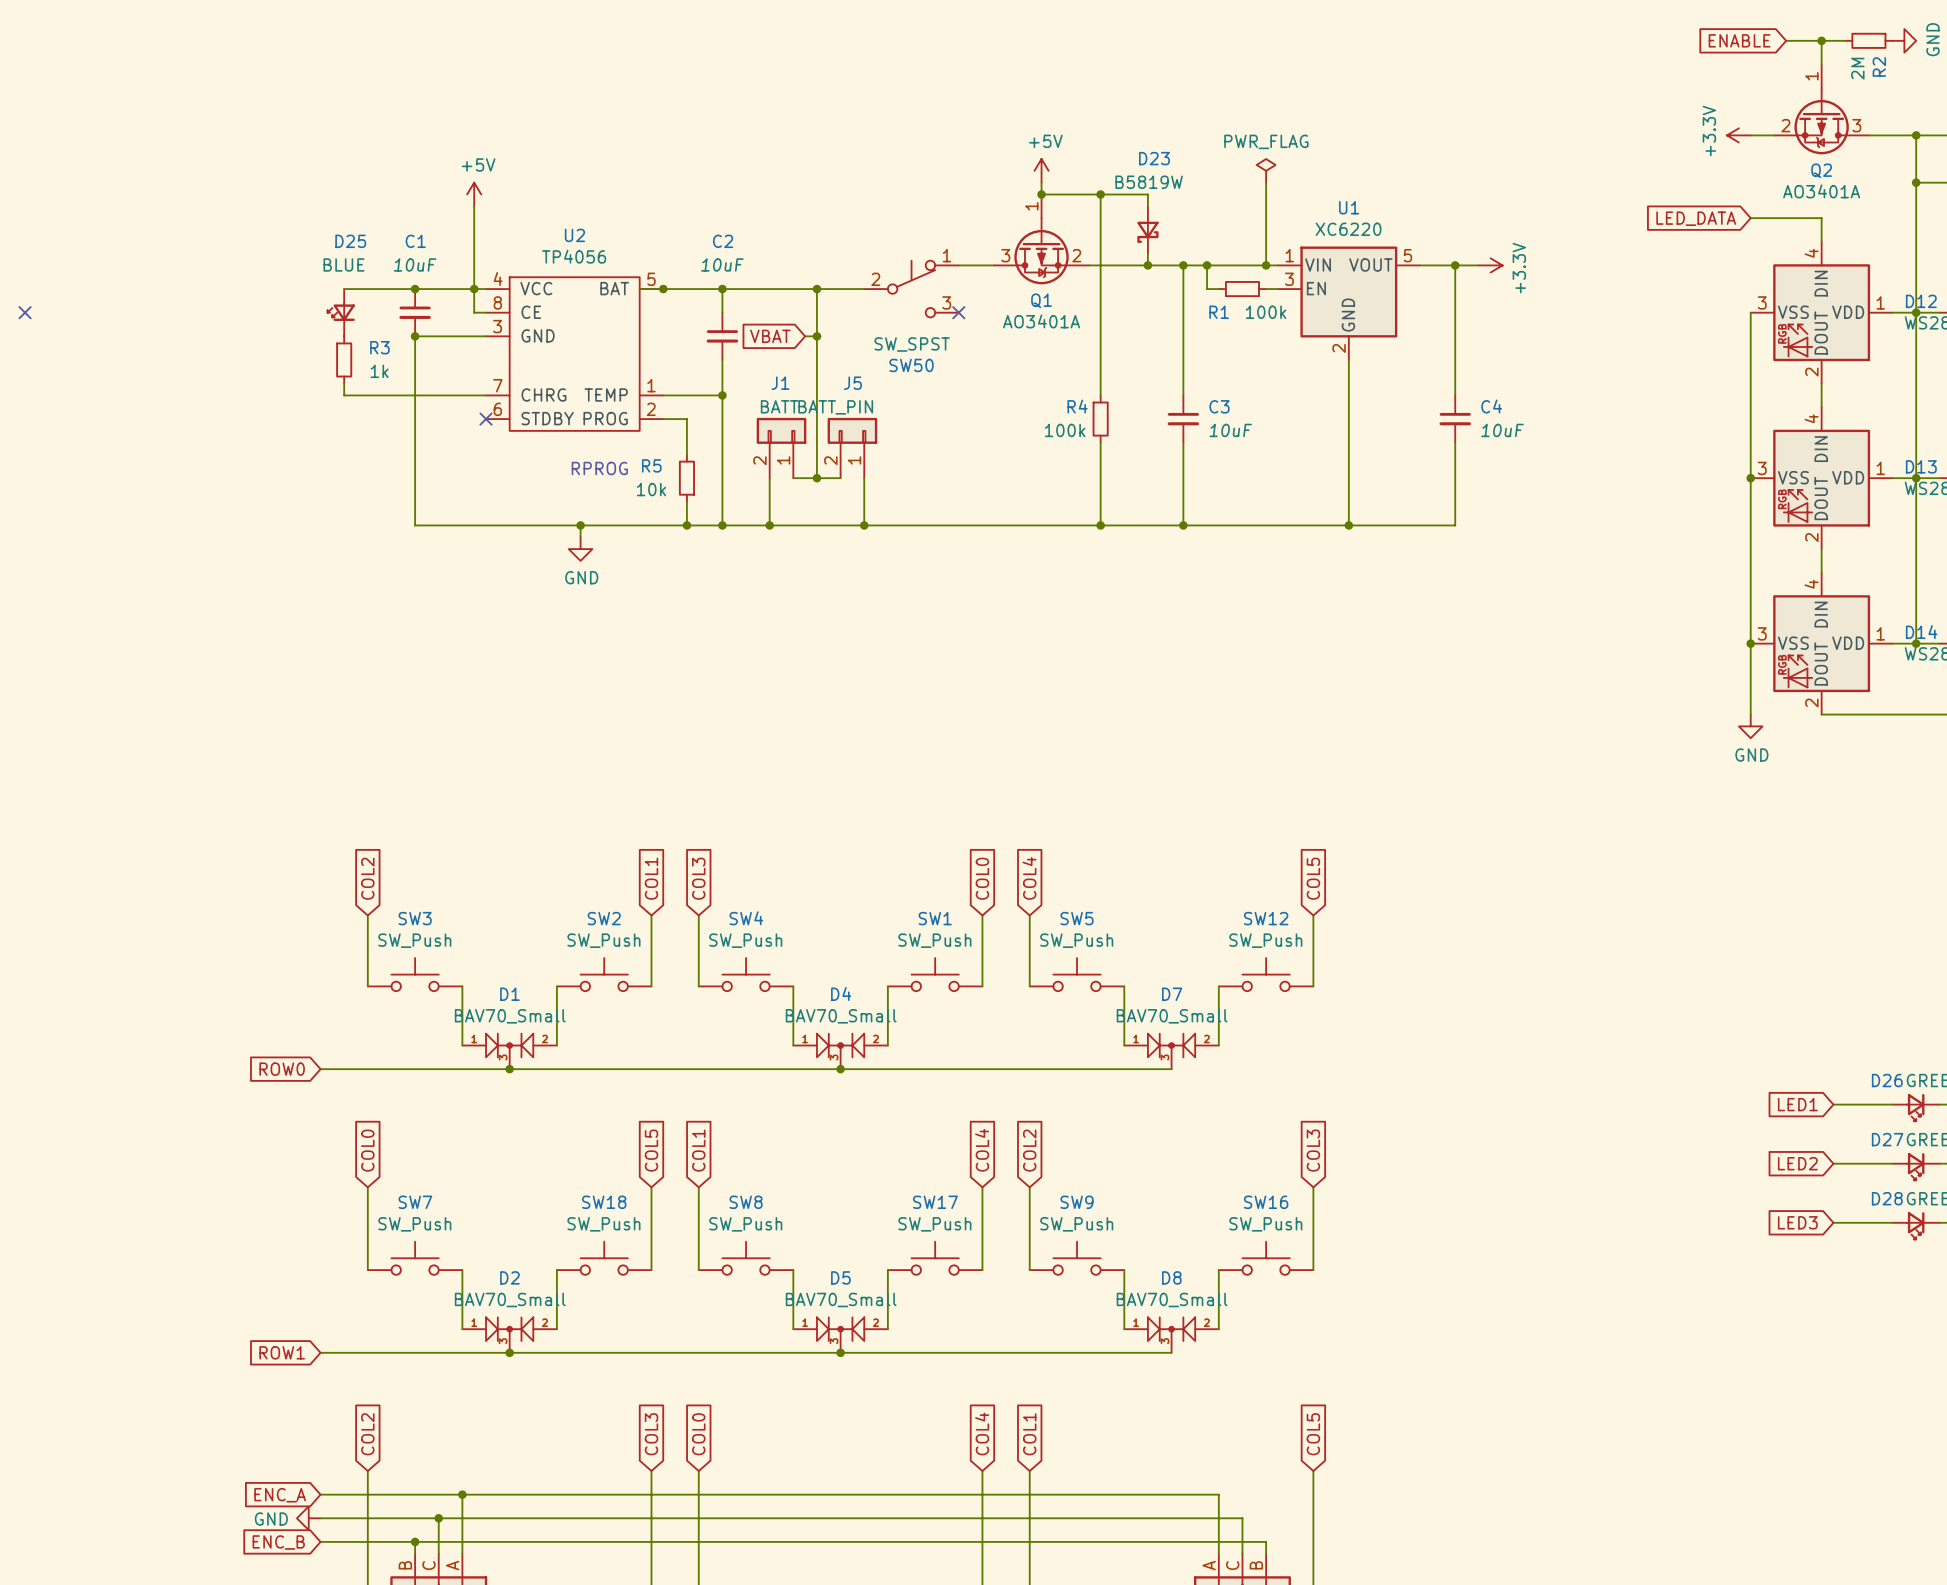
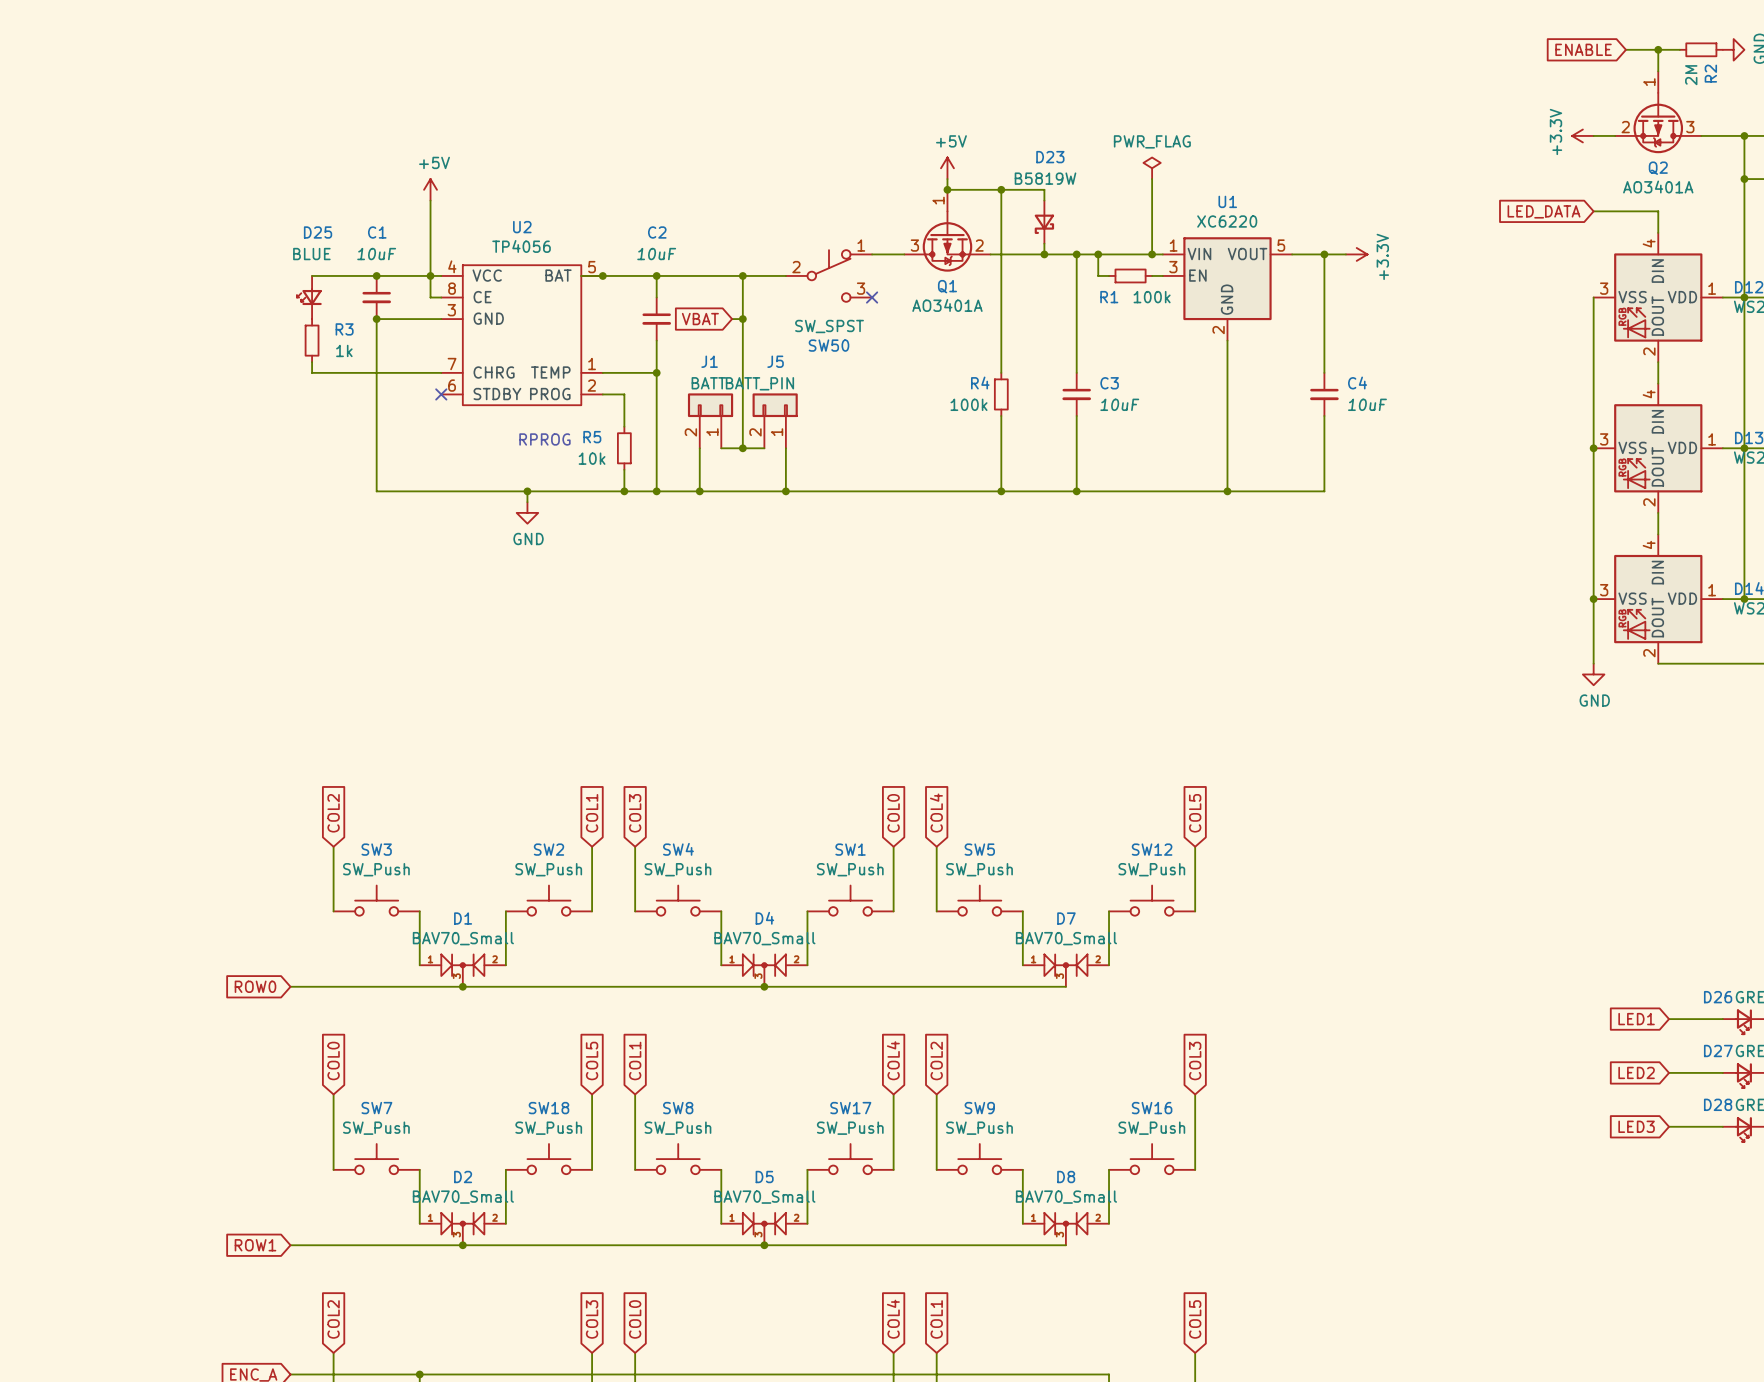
no-connect mark: (25, 312) -> none

